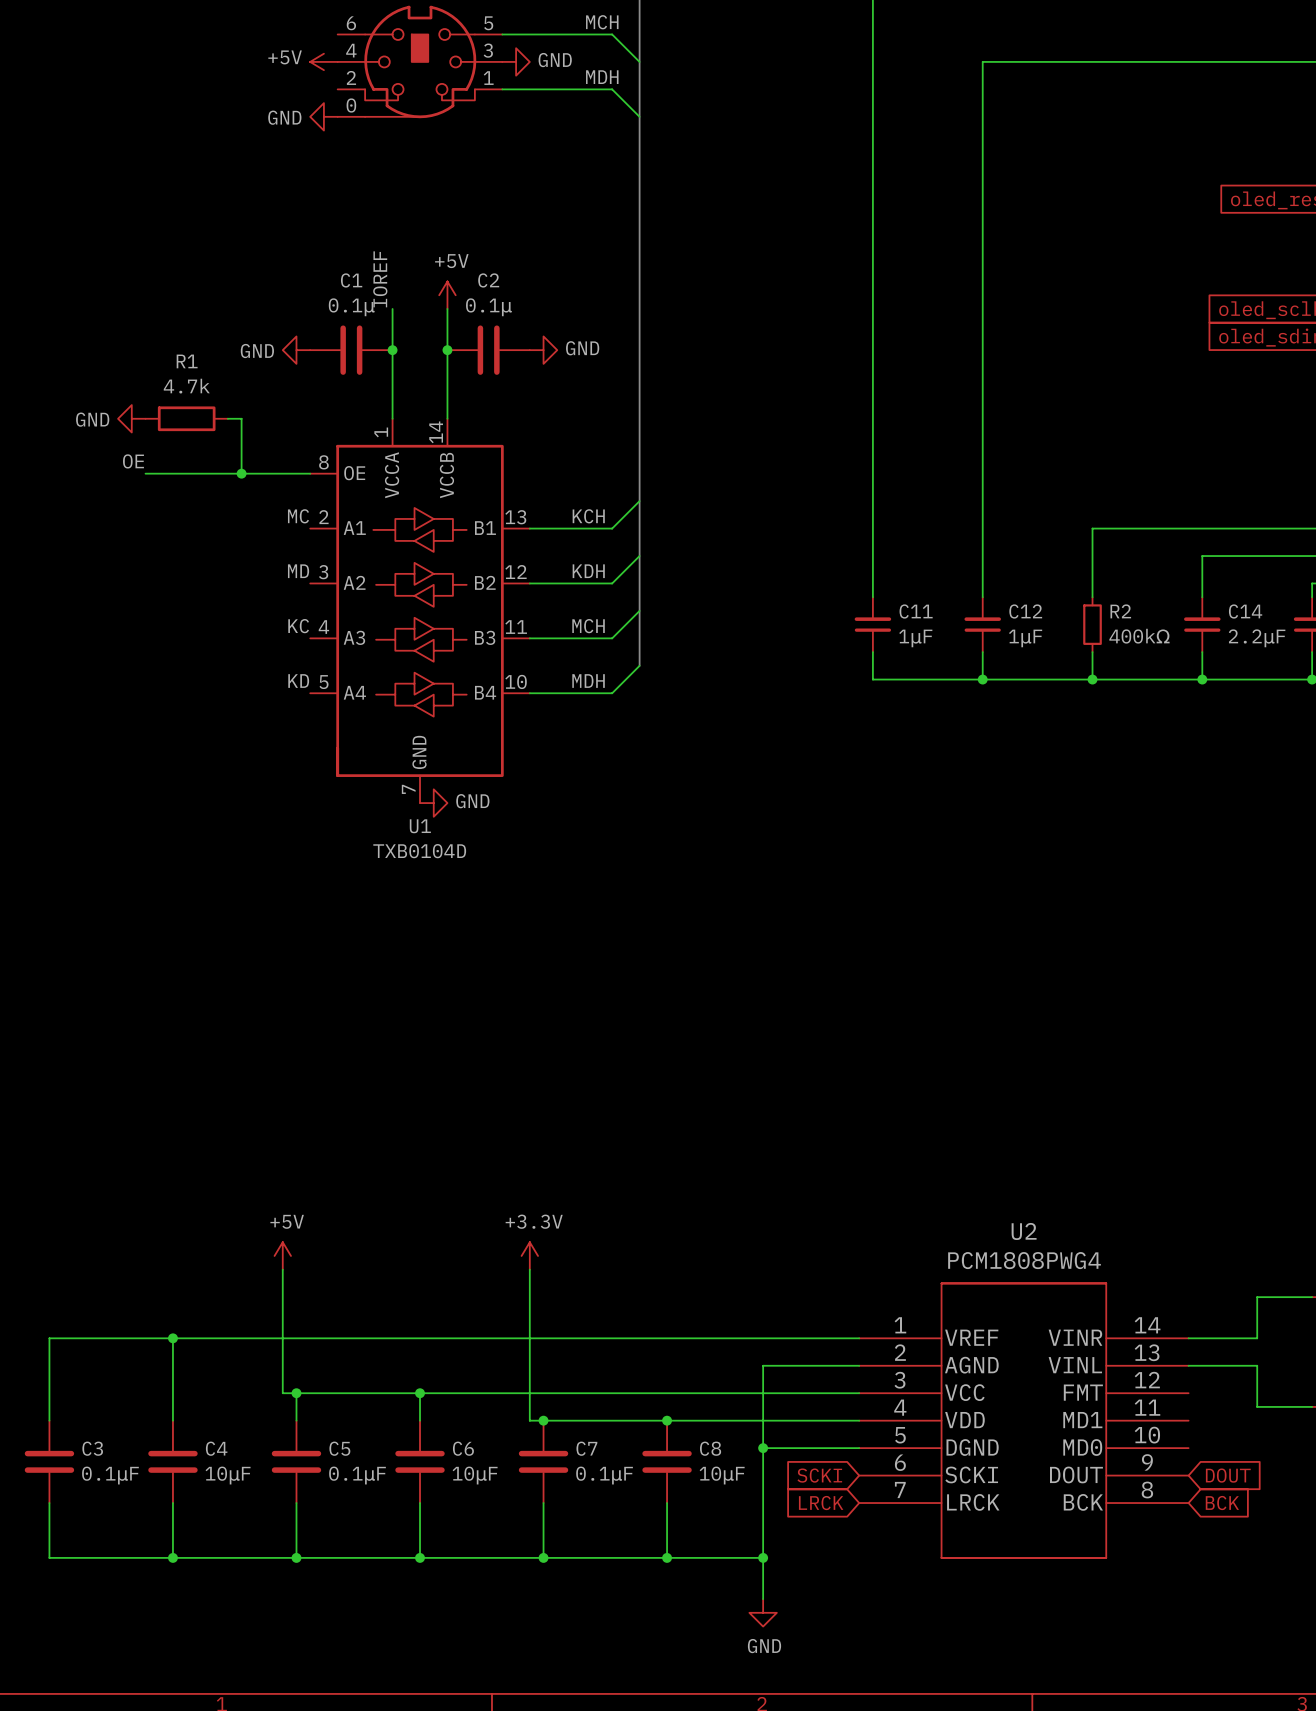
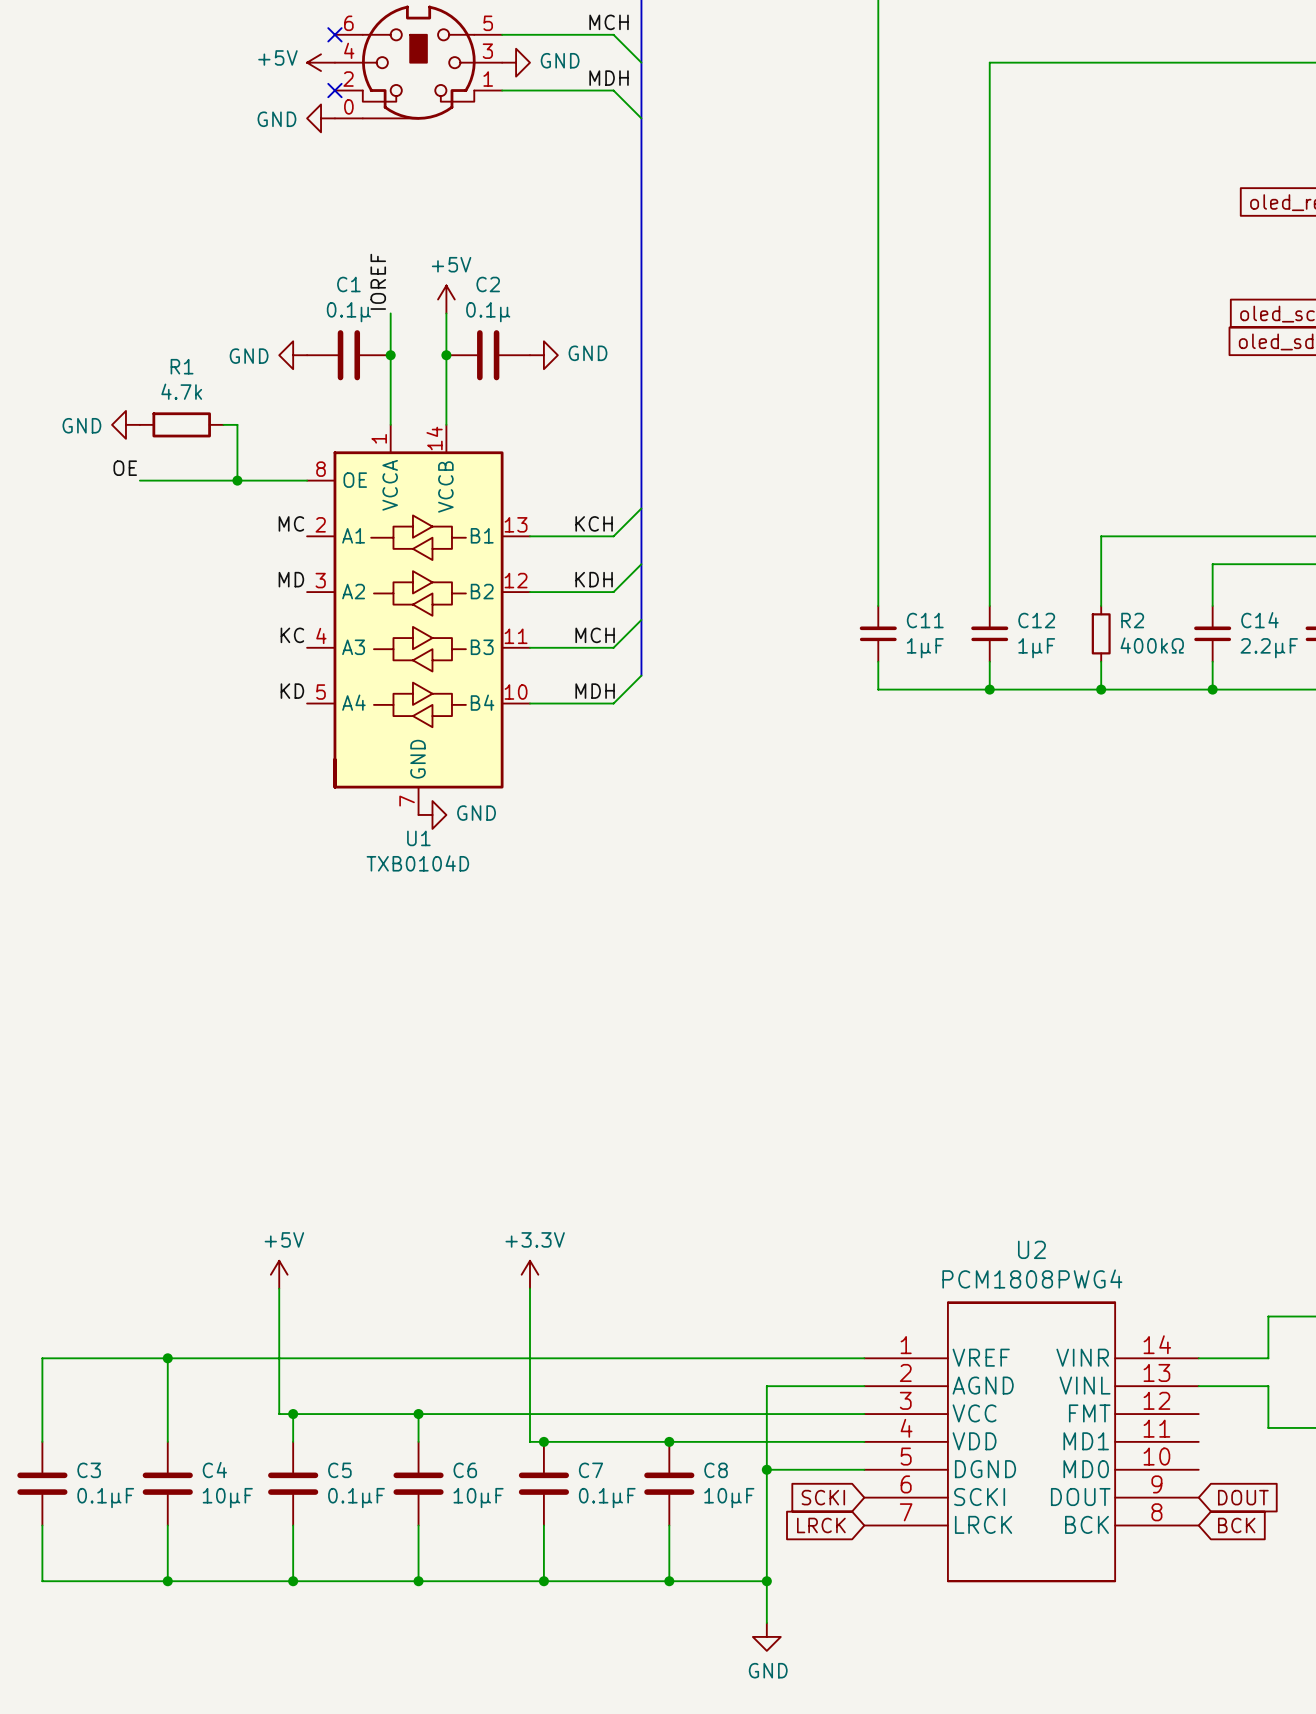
no-connect mark: none -> (334, 34)
no-connect mark: none -> (334, 90)

